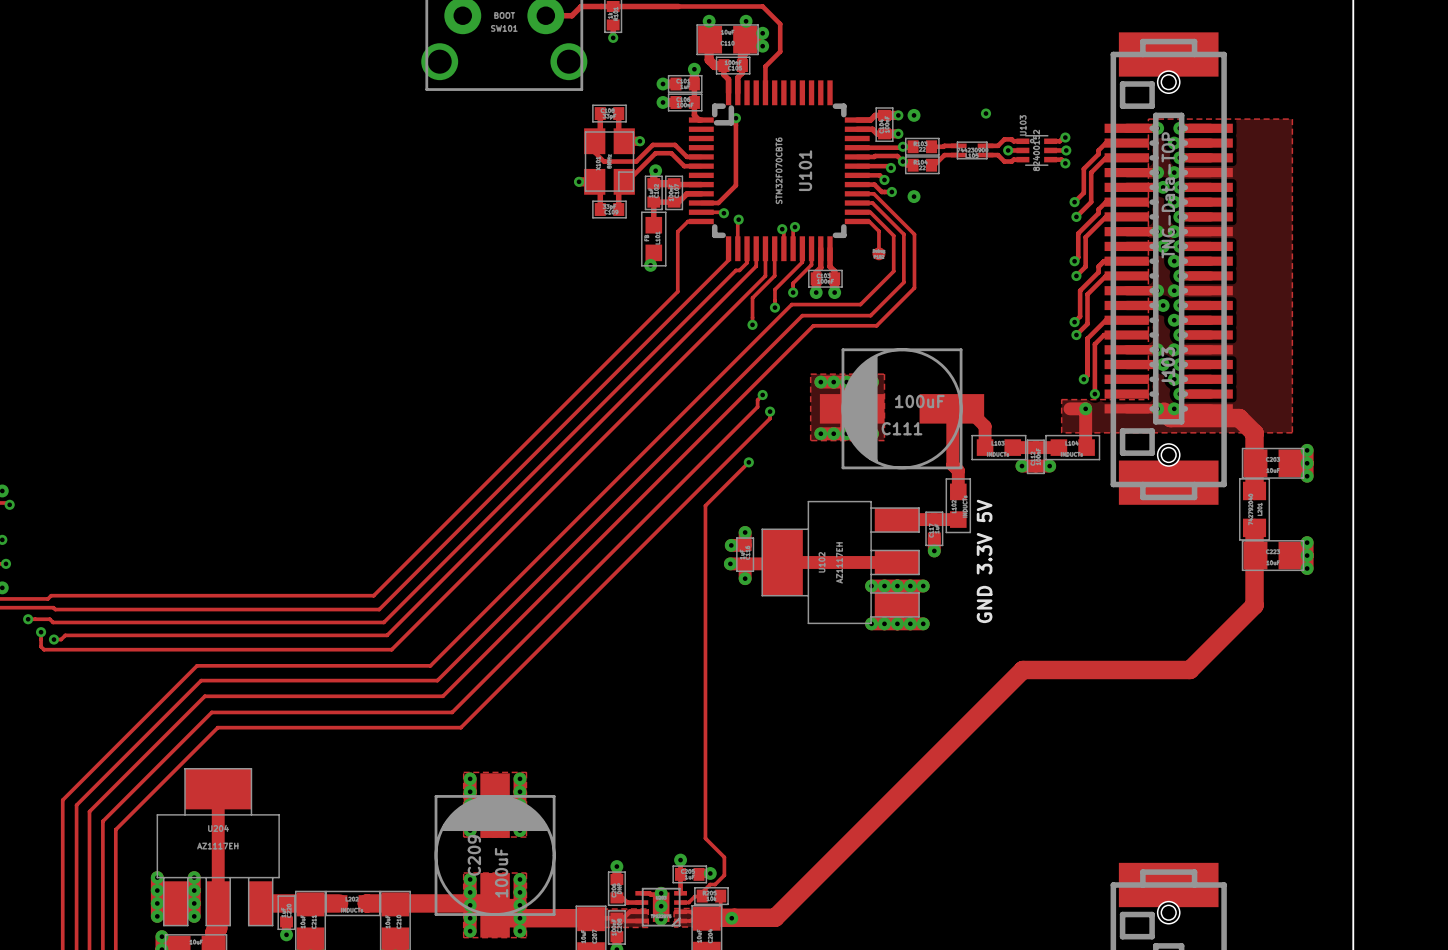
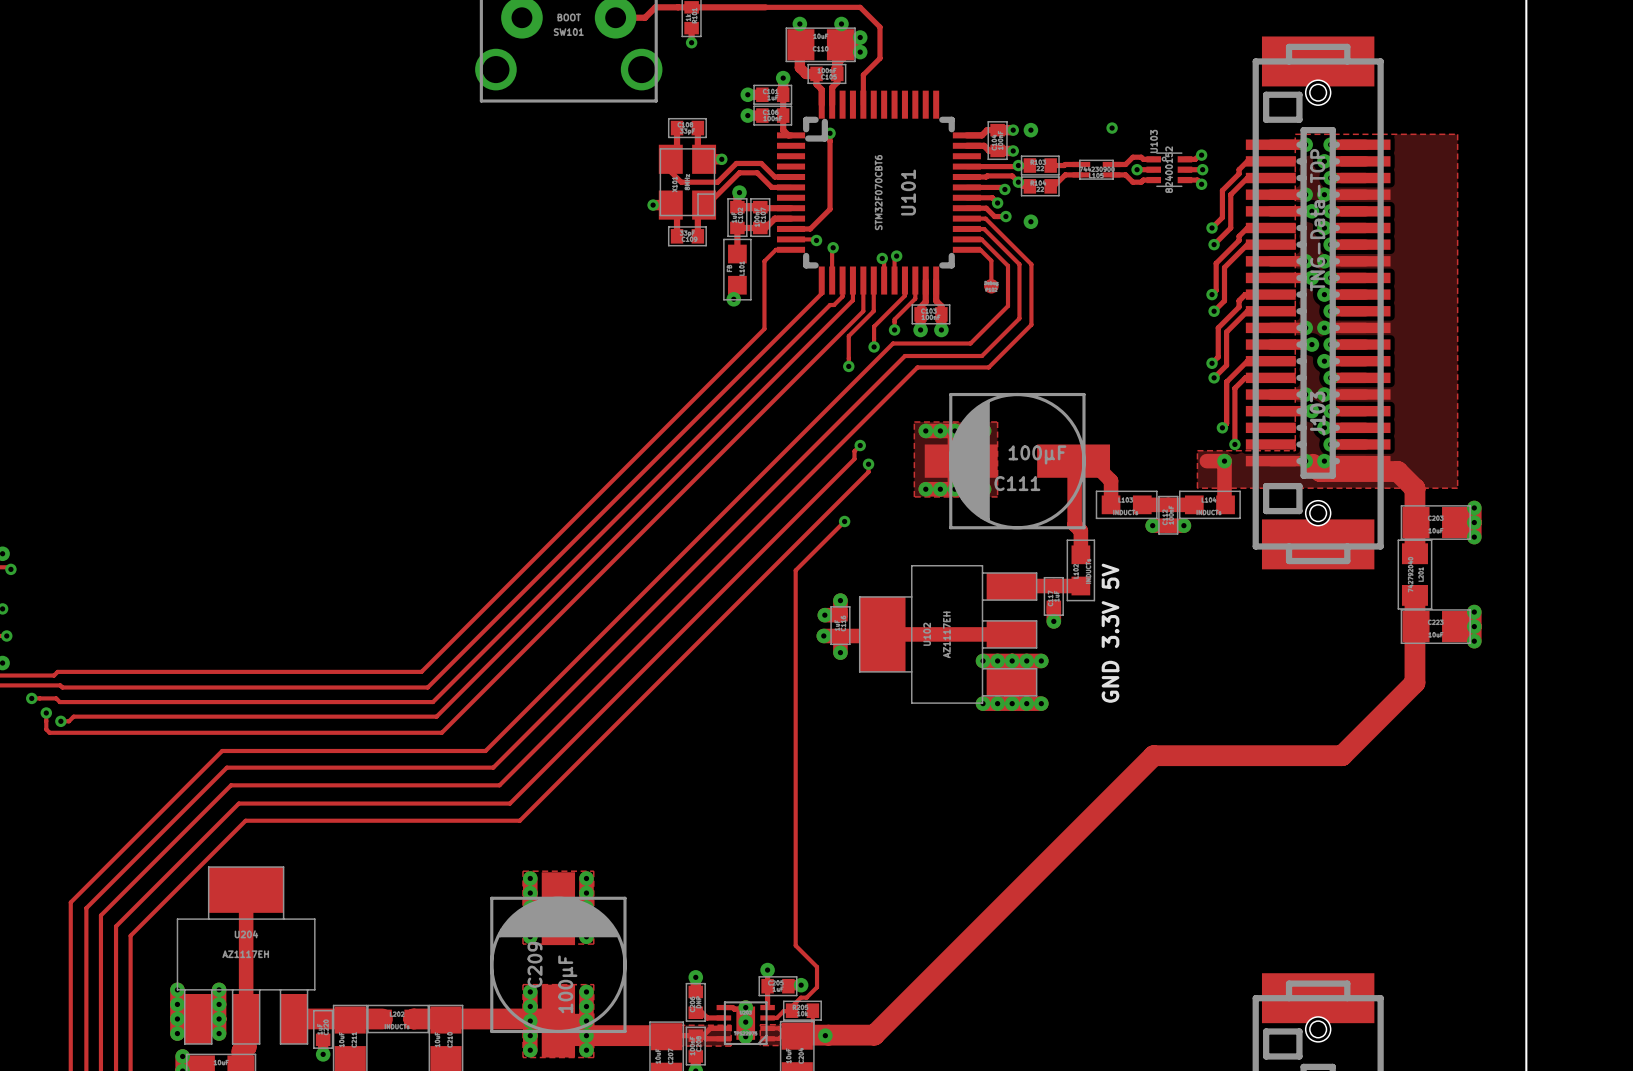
C111 value: 100uF (919, 401) -> 100µF (1037, 454)
C209 value: 100uF (501, 872) -> 100µF (567, 984)

